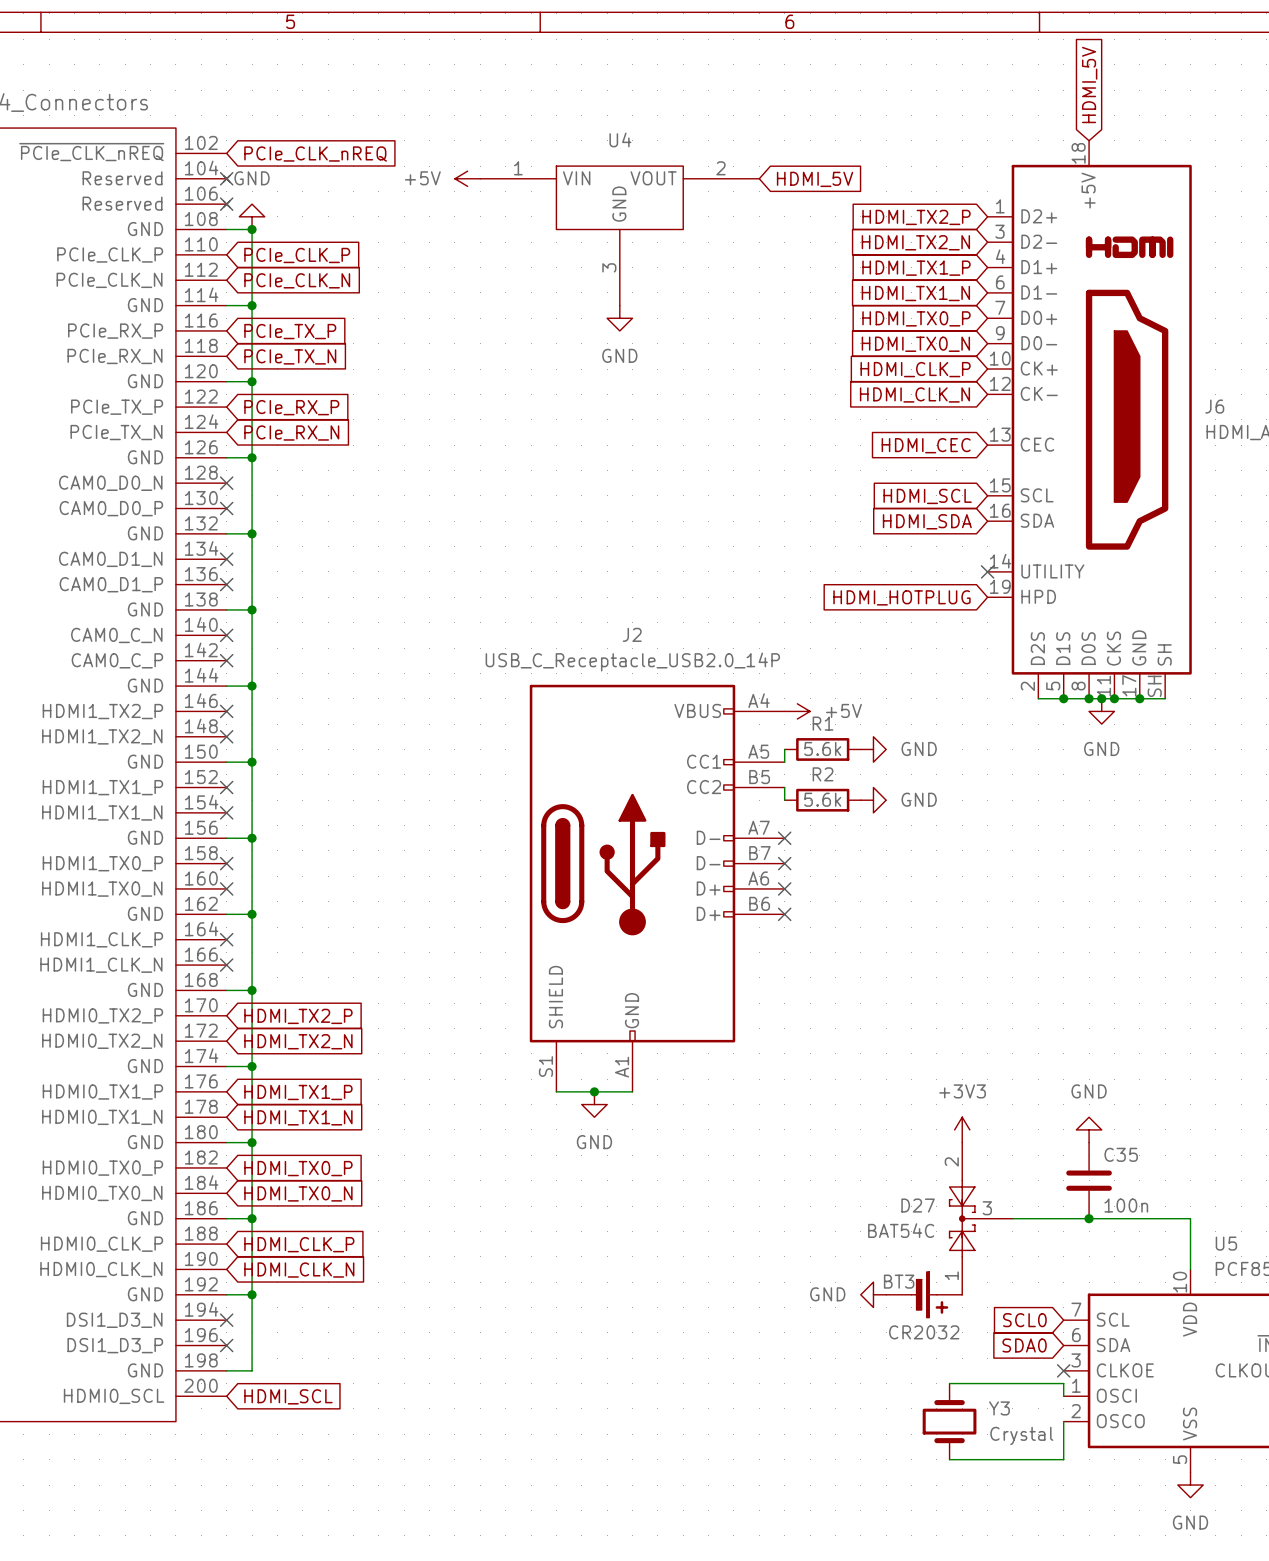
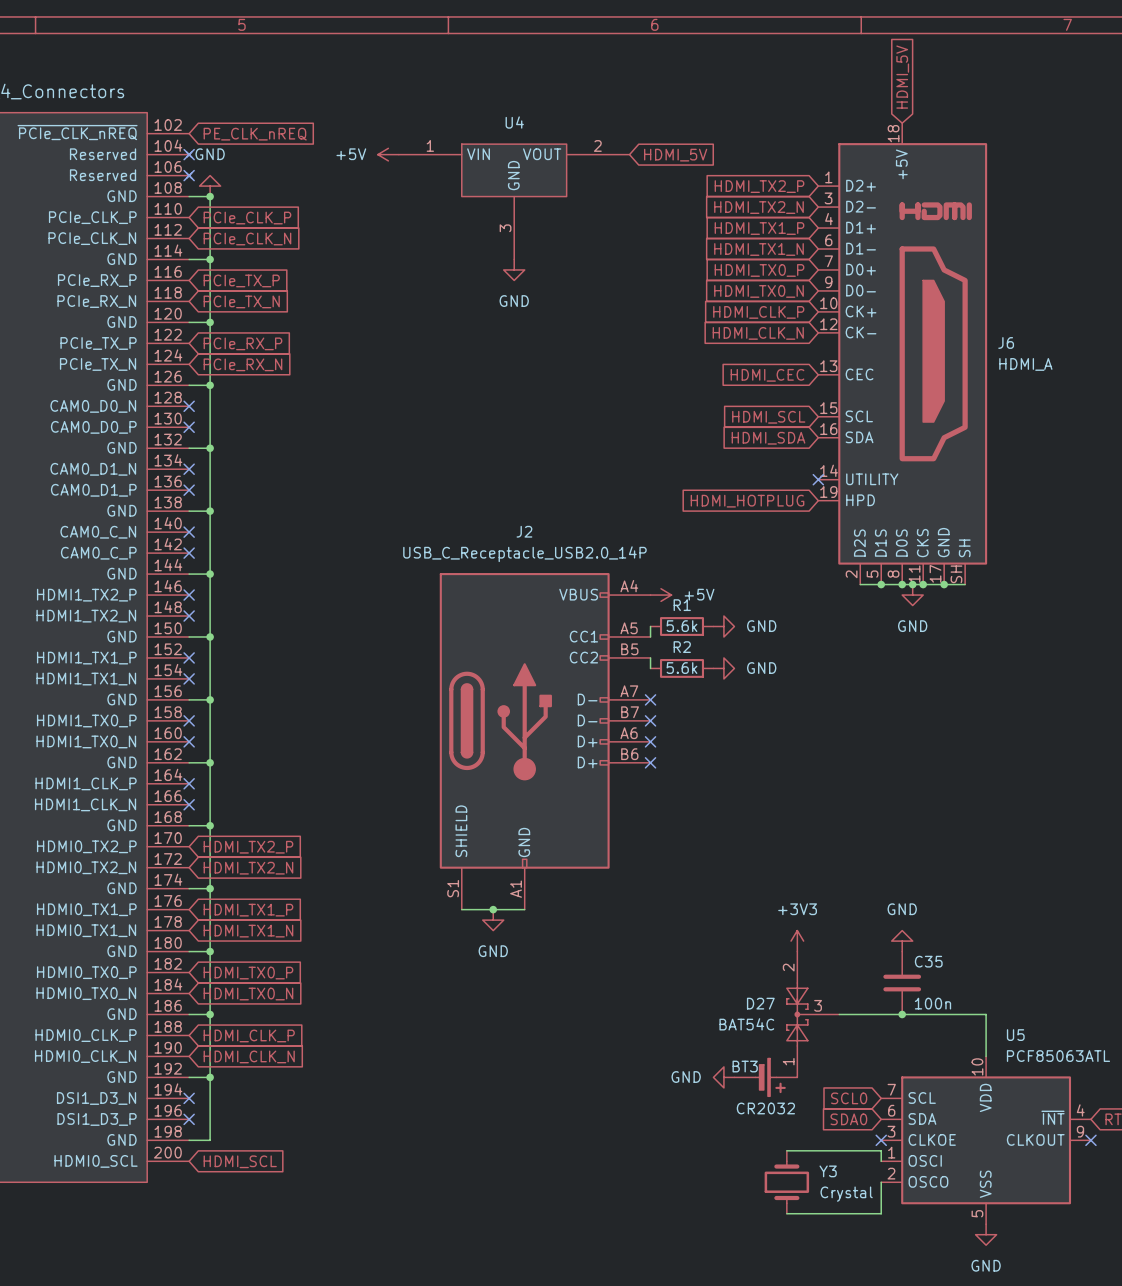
global label: PCIe_CLK_nREQ (315, 154) -> PE_CLK_nREQ (255, 134)

